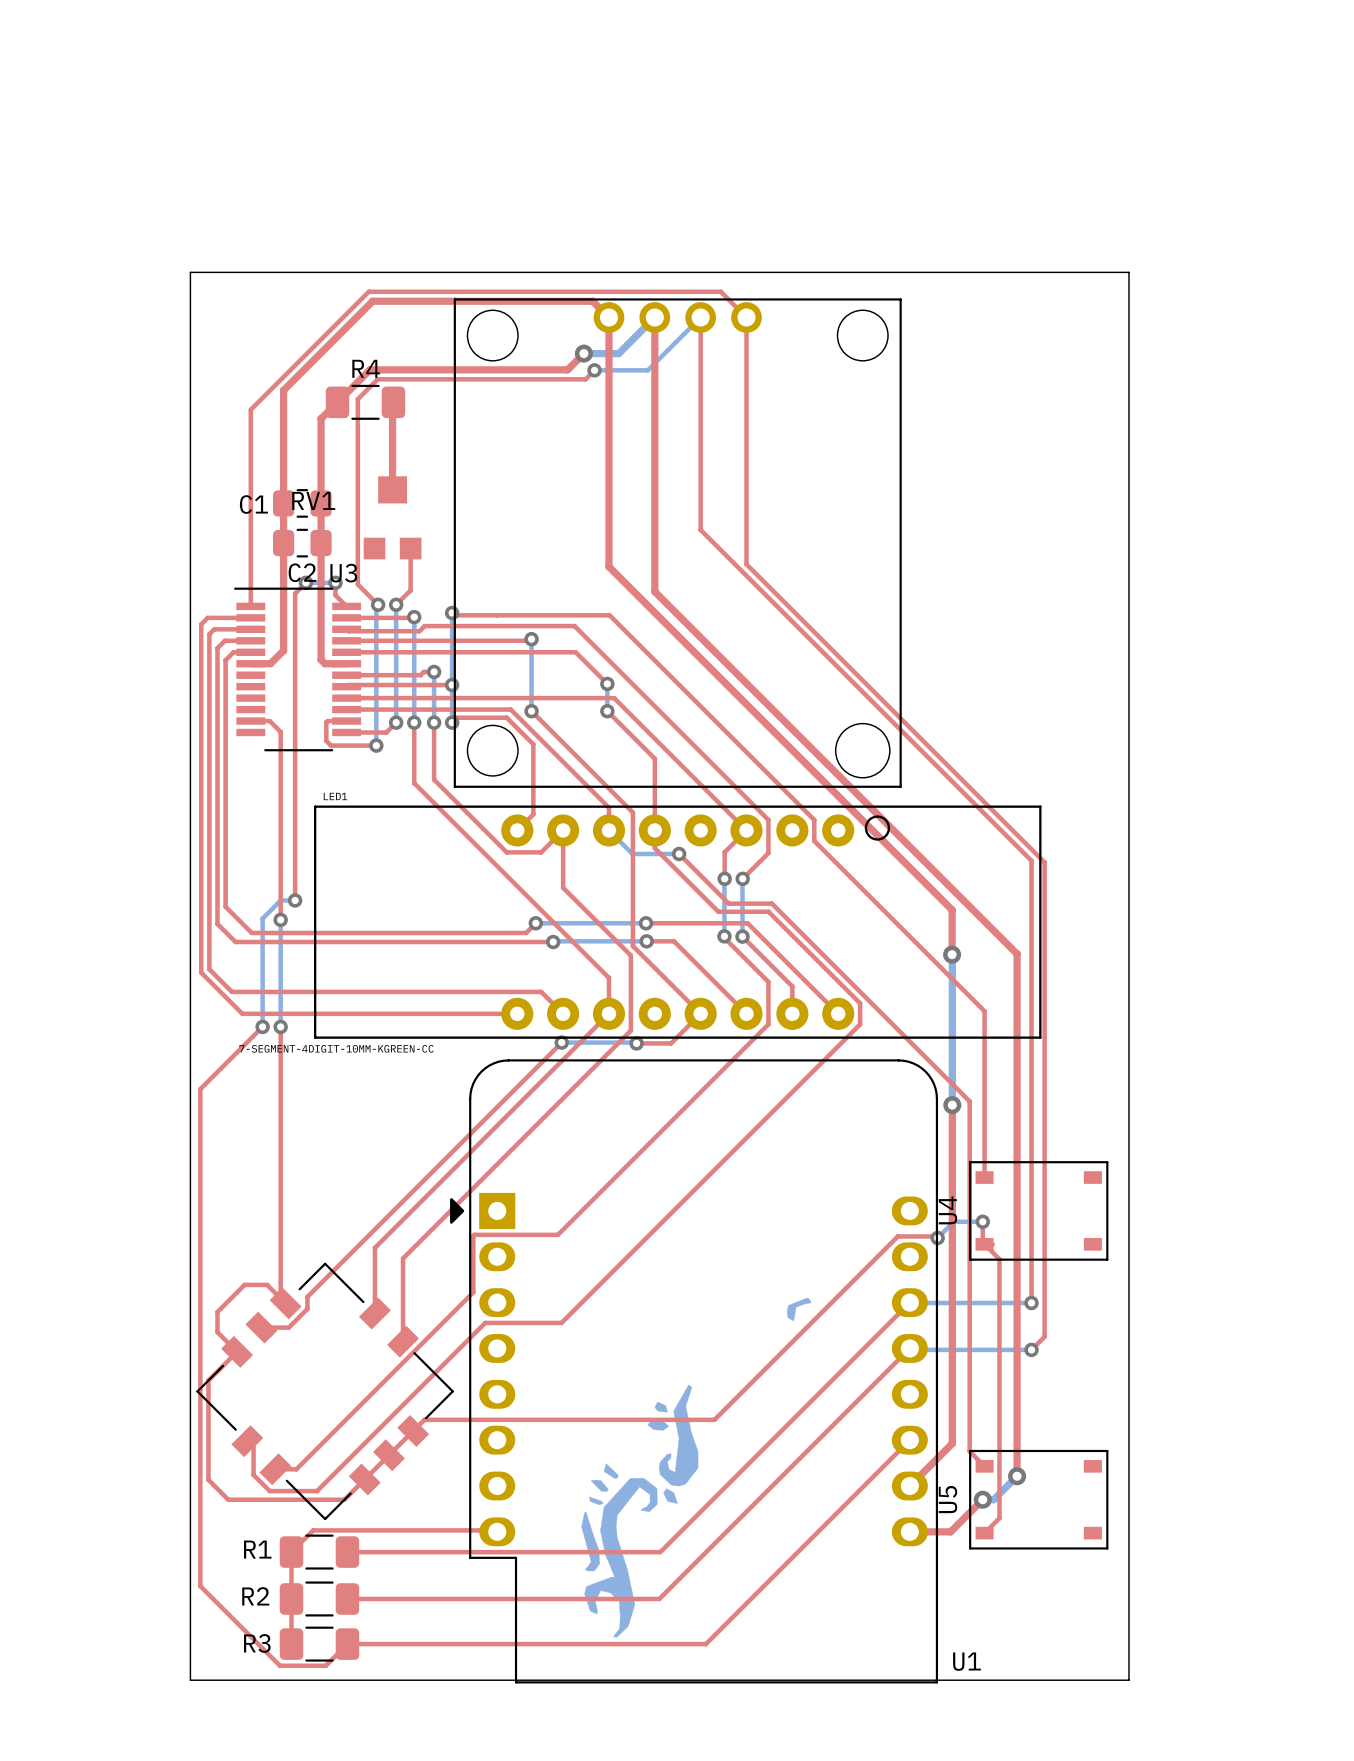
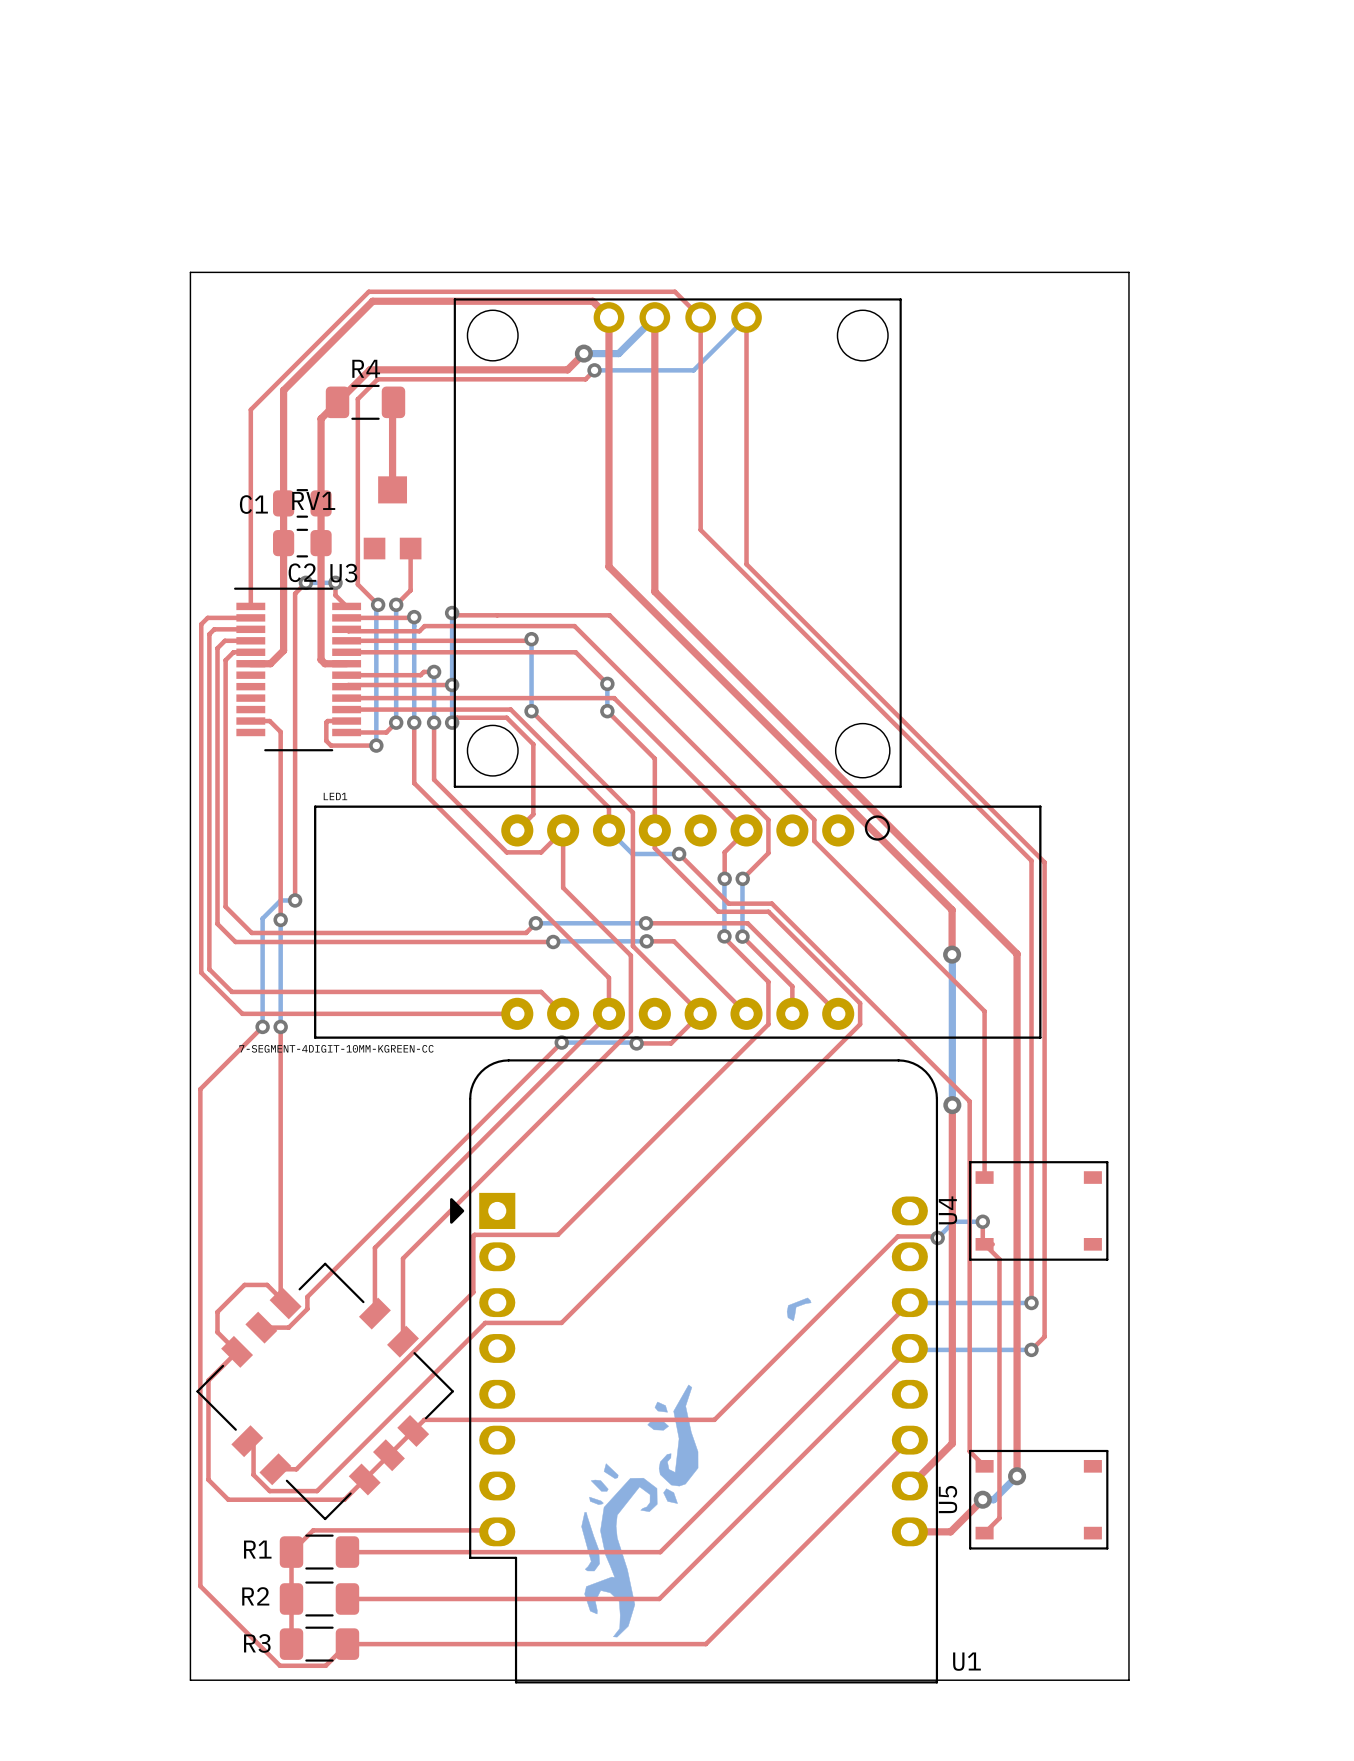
top track: (674, 291) (720, 291) (746, 317) -> (674, 291) (700, 317)
bottom track: (700, 317) (647, 370) -> (746, 317) (693, 370) (647, 370)

